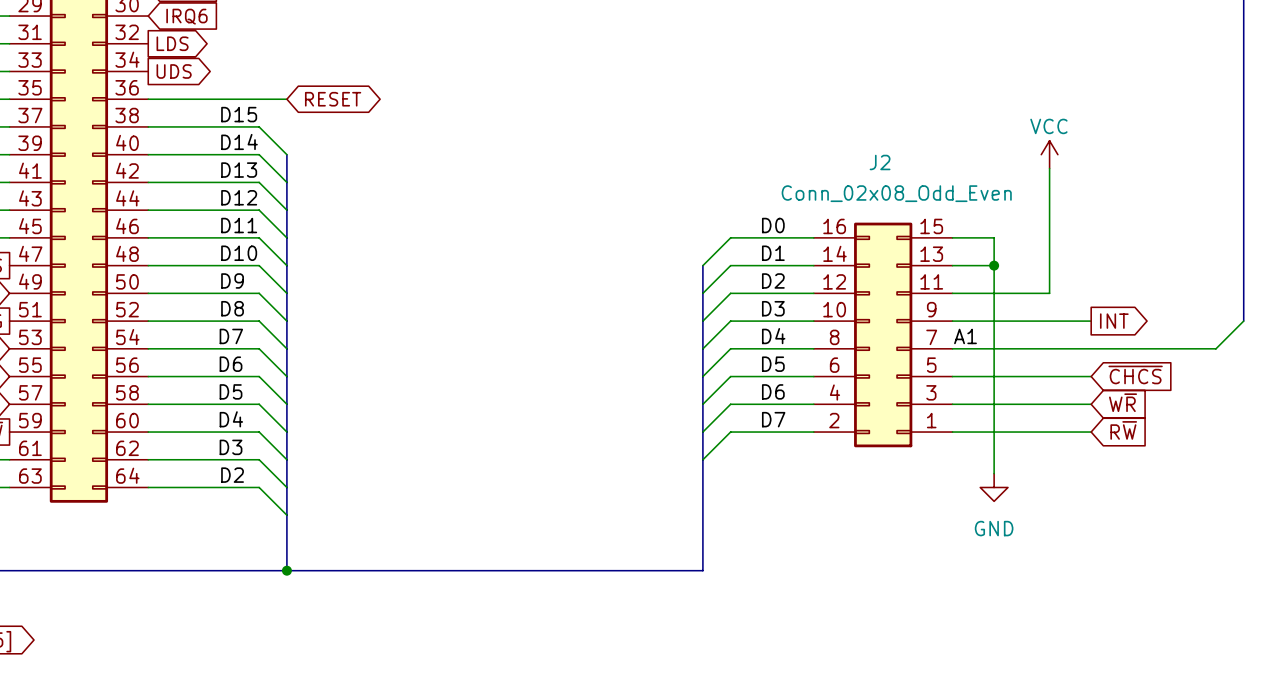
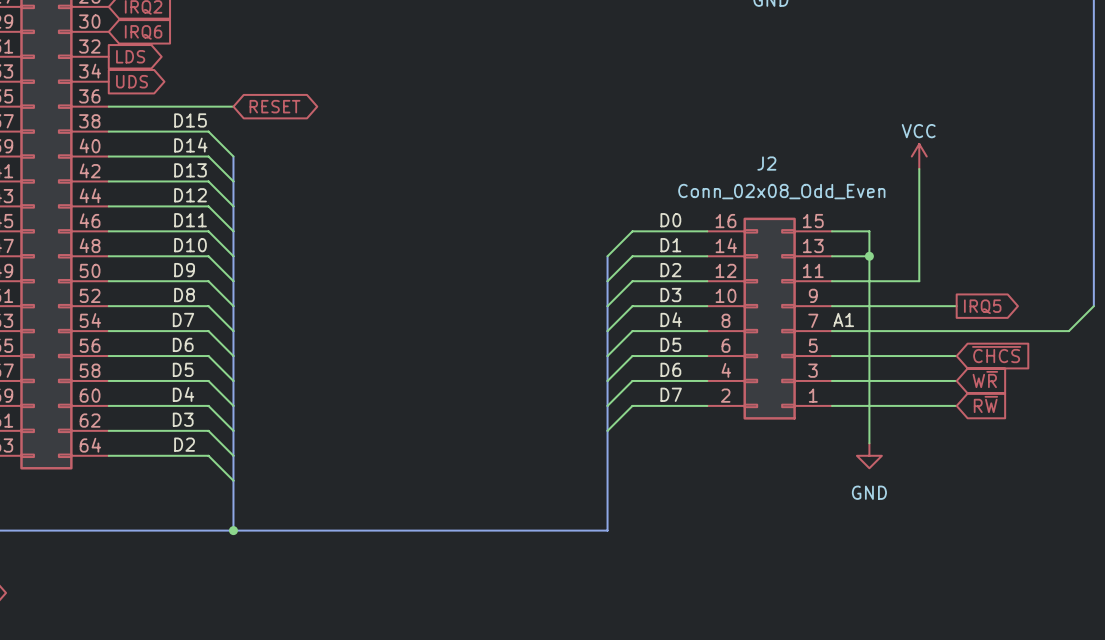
global label: INT (1114, 321) -> IRQ5 (982, 306)

